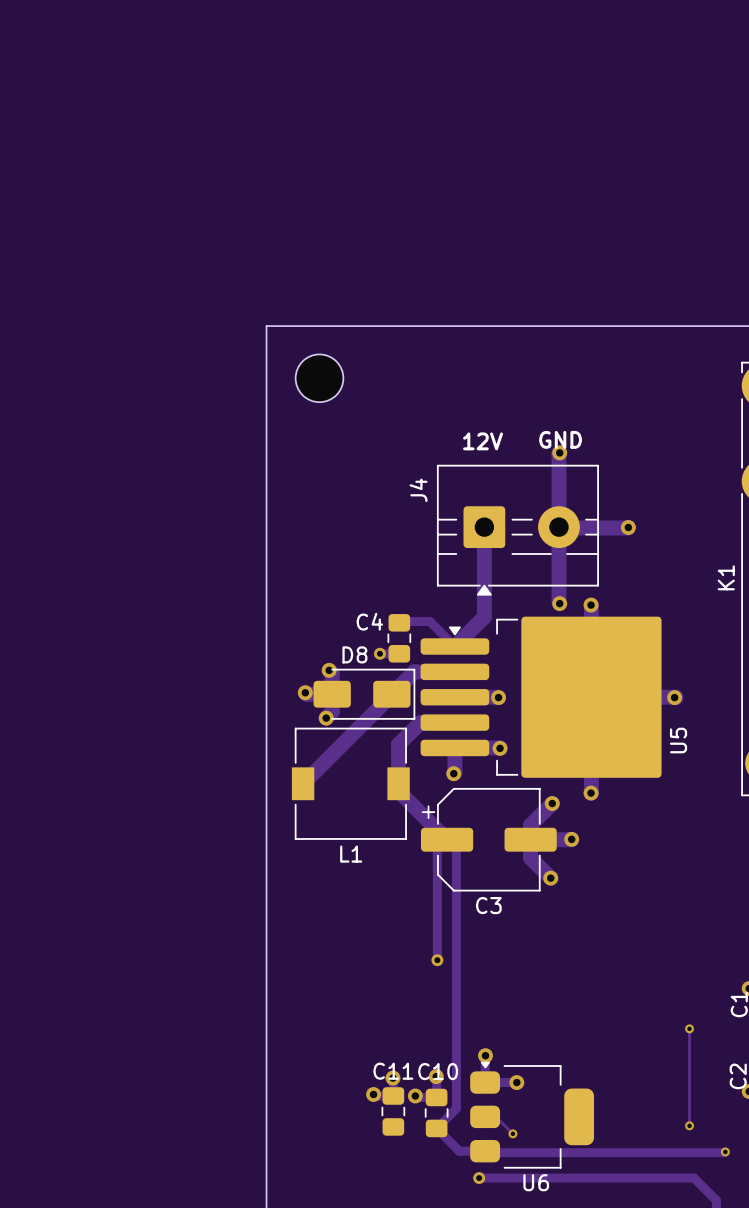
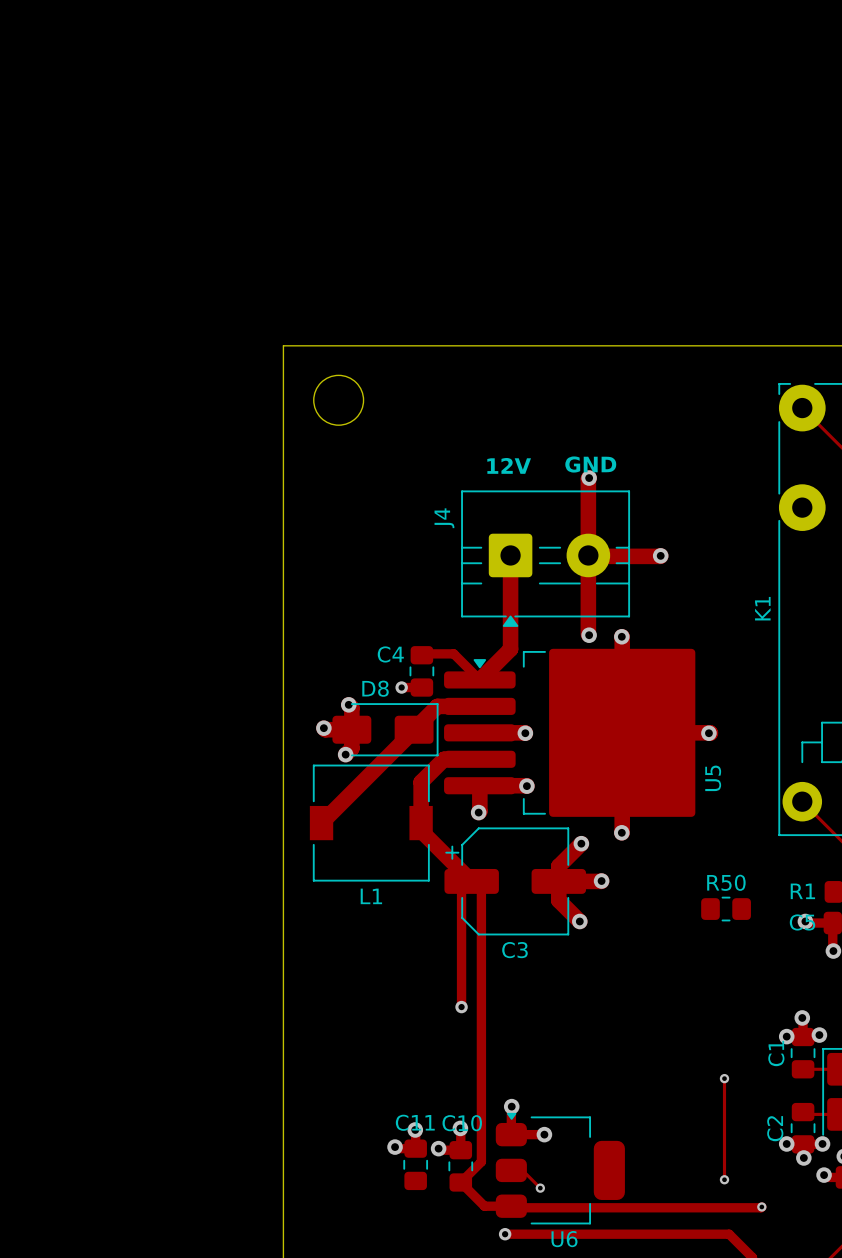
R50: none -> (726, 909)

